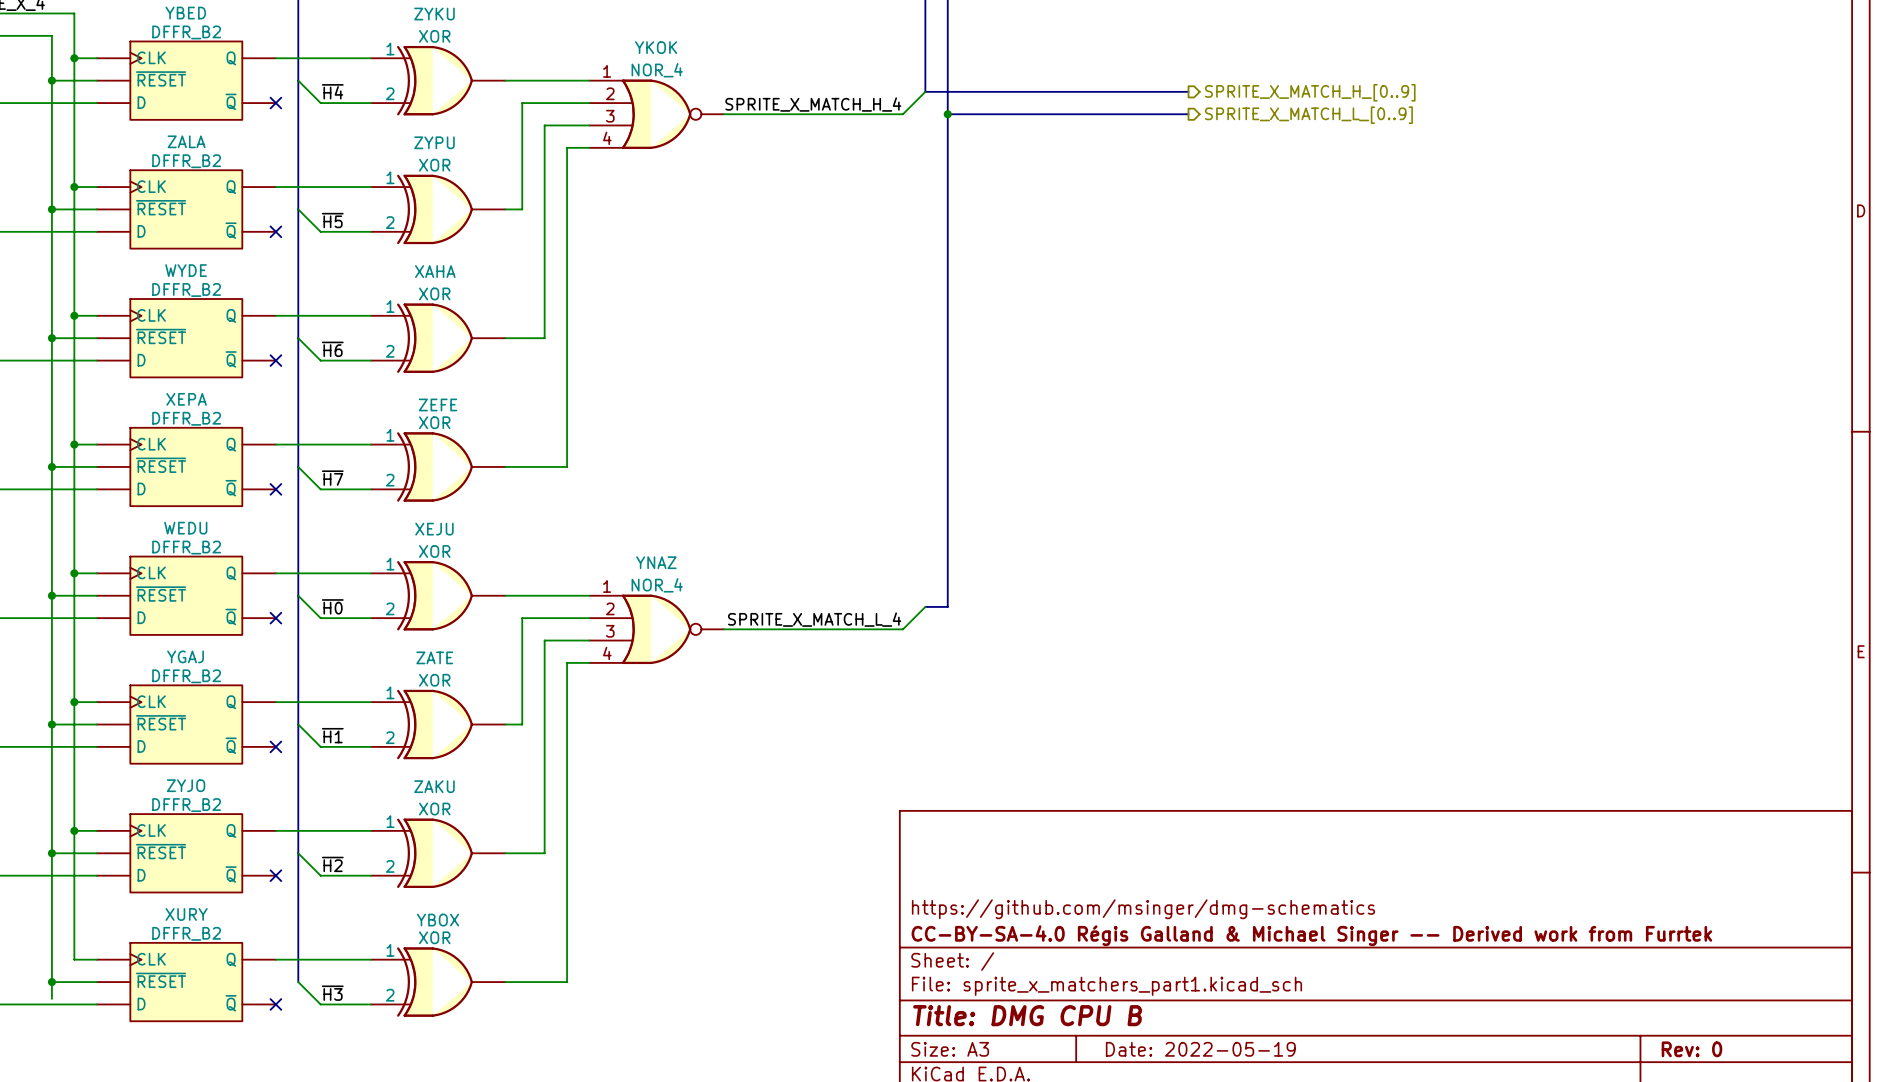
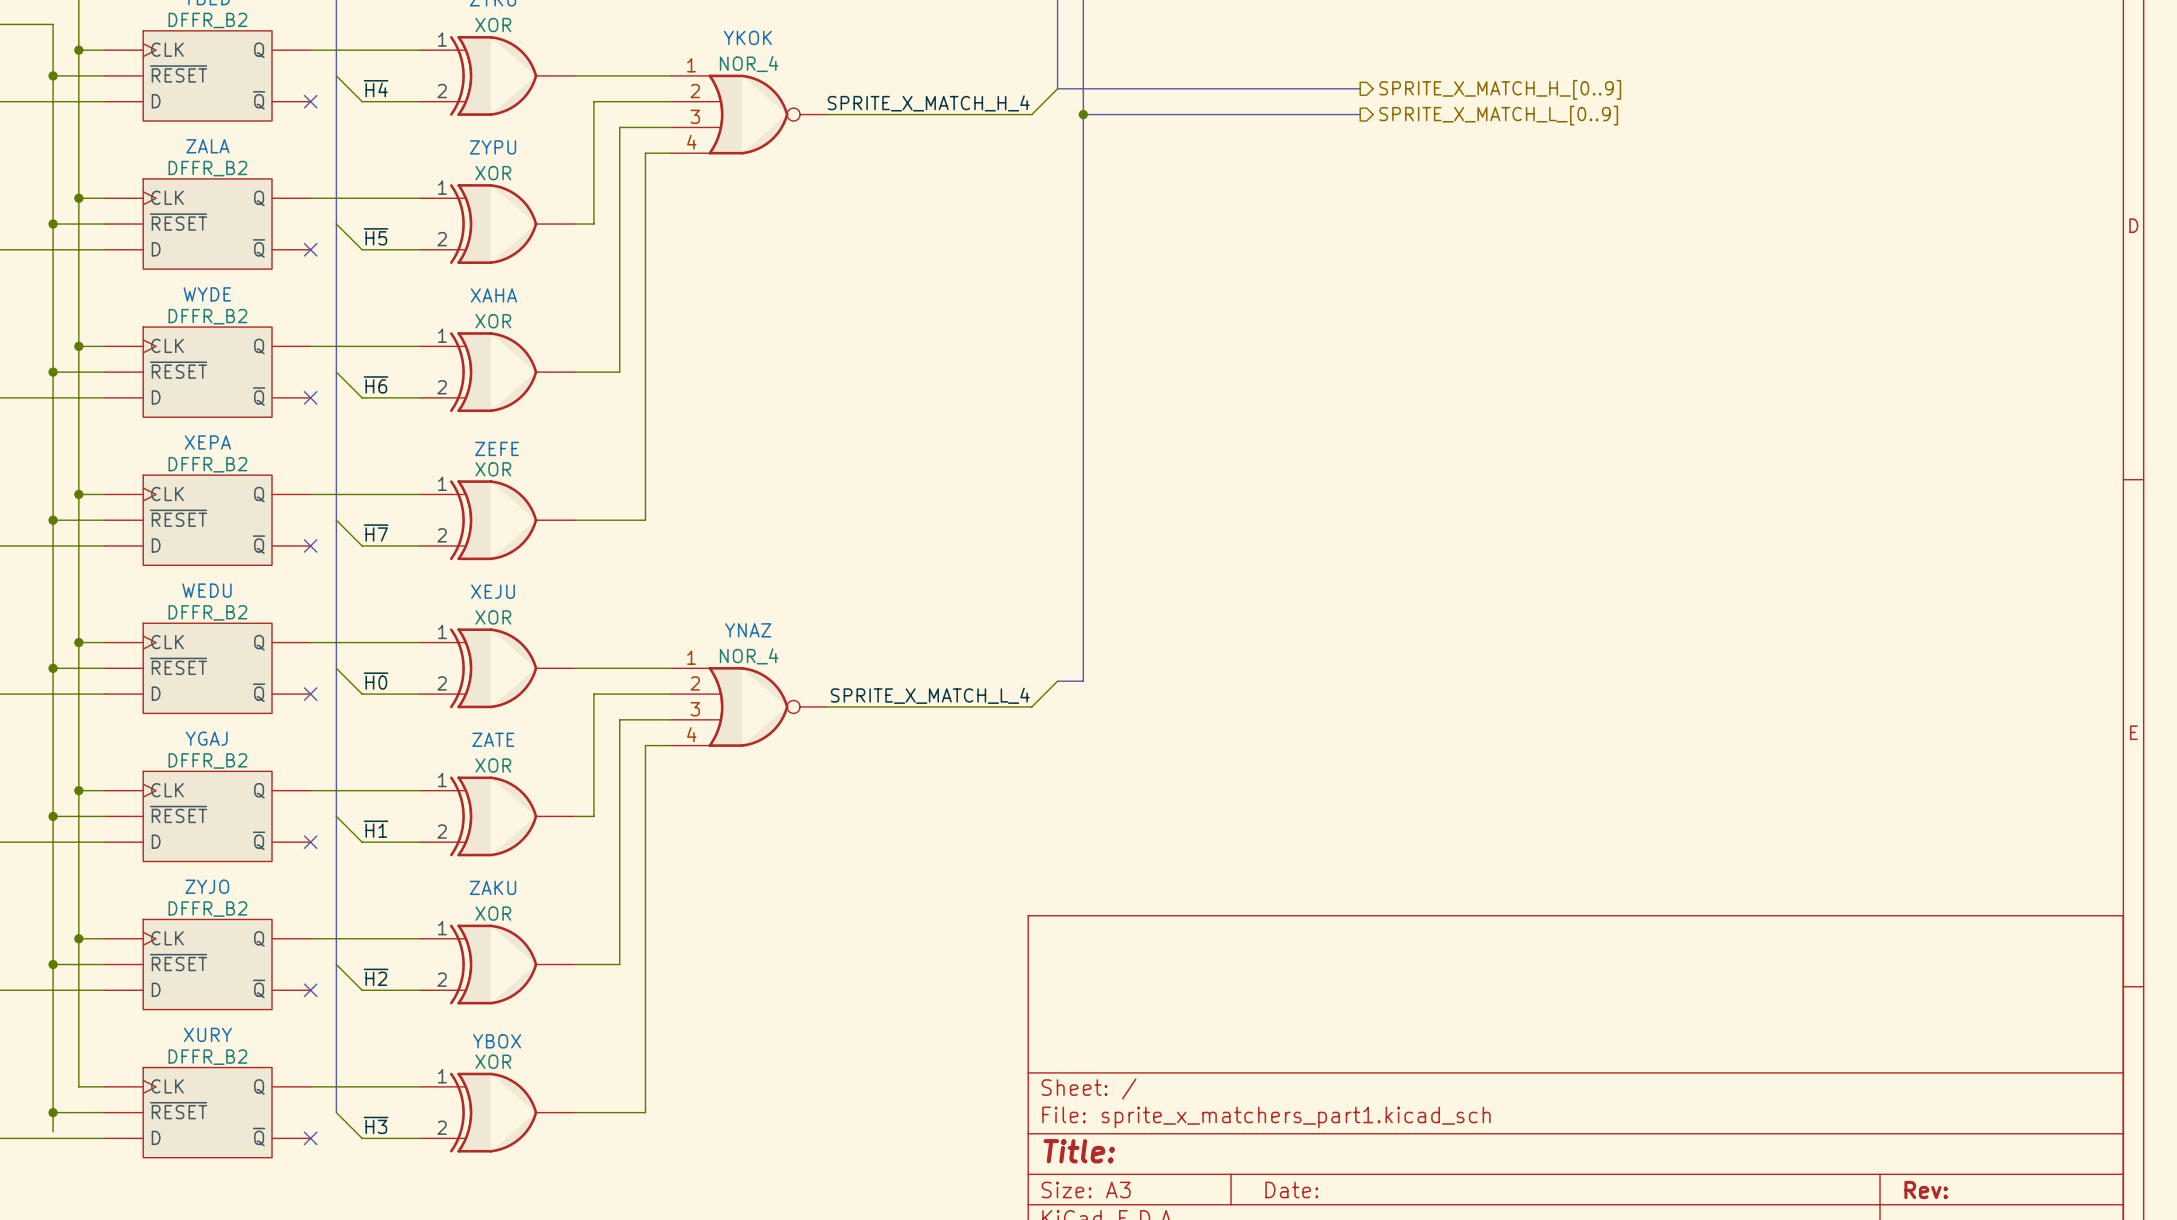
title block: https://github.com/msinger/dmg-schematics (1143, 909) -> none
title block: CC-BY-SA-4.0 Régis Galland & Michael Singer -- Derived work from Furrtek (1311, 935) -> none
title block: Title: DMG CPU B (1027, 1015) -> Title: (1079, 1151)
title block: Date: 2022-05-19 (1200, 1049) -> Date: (1291, 1189)
title block: Rev: 0 (1691, 1049) -> Rev: (1926, 1189)

